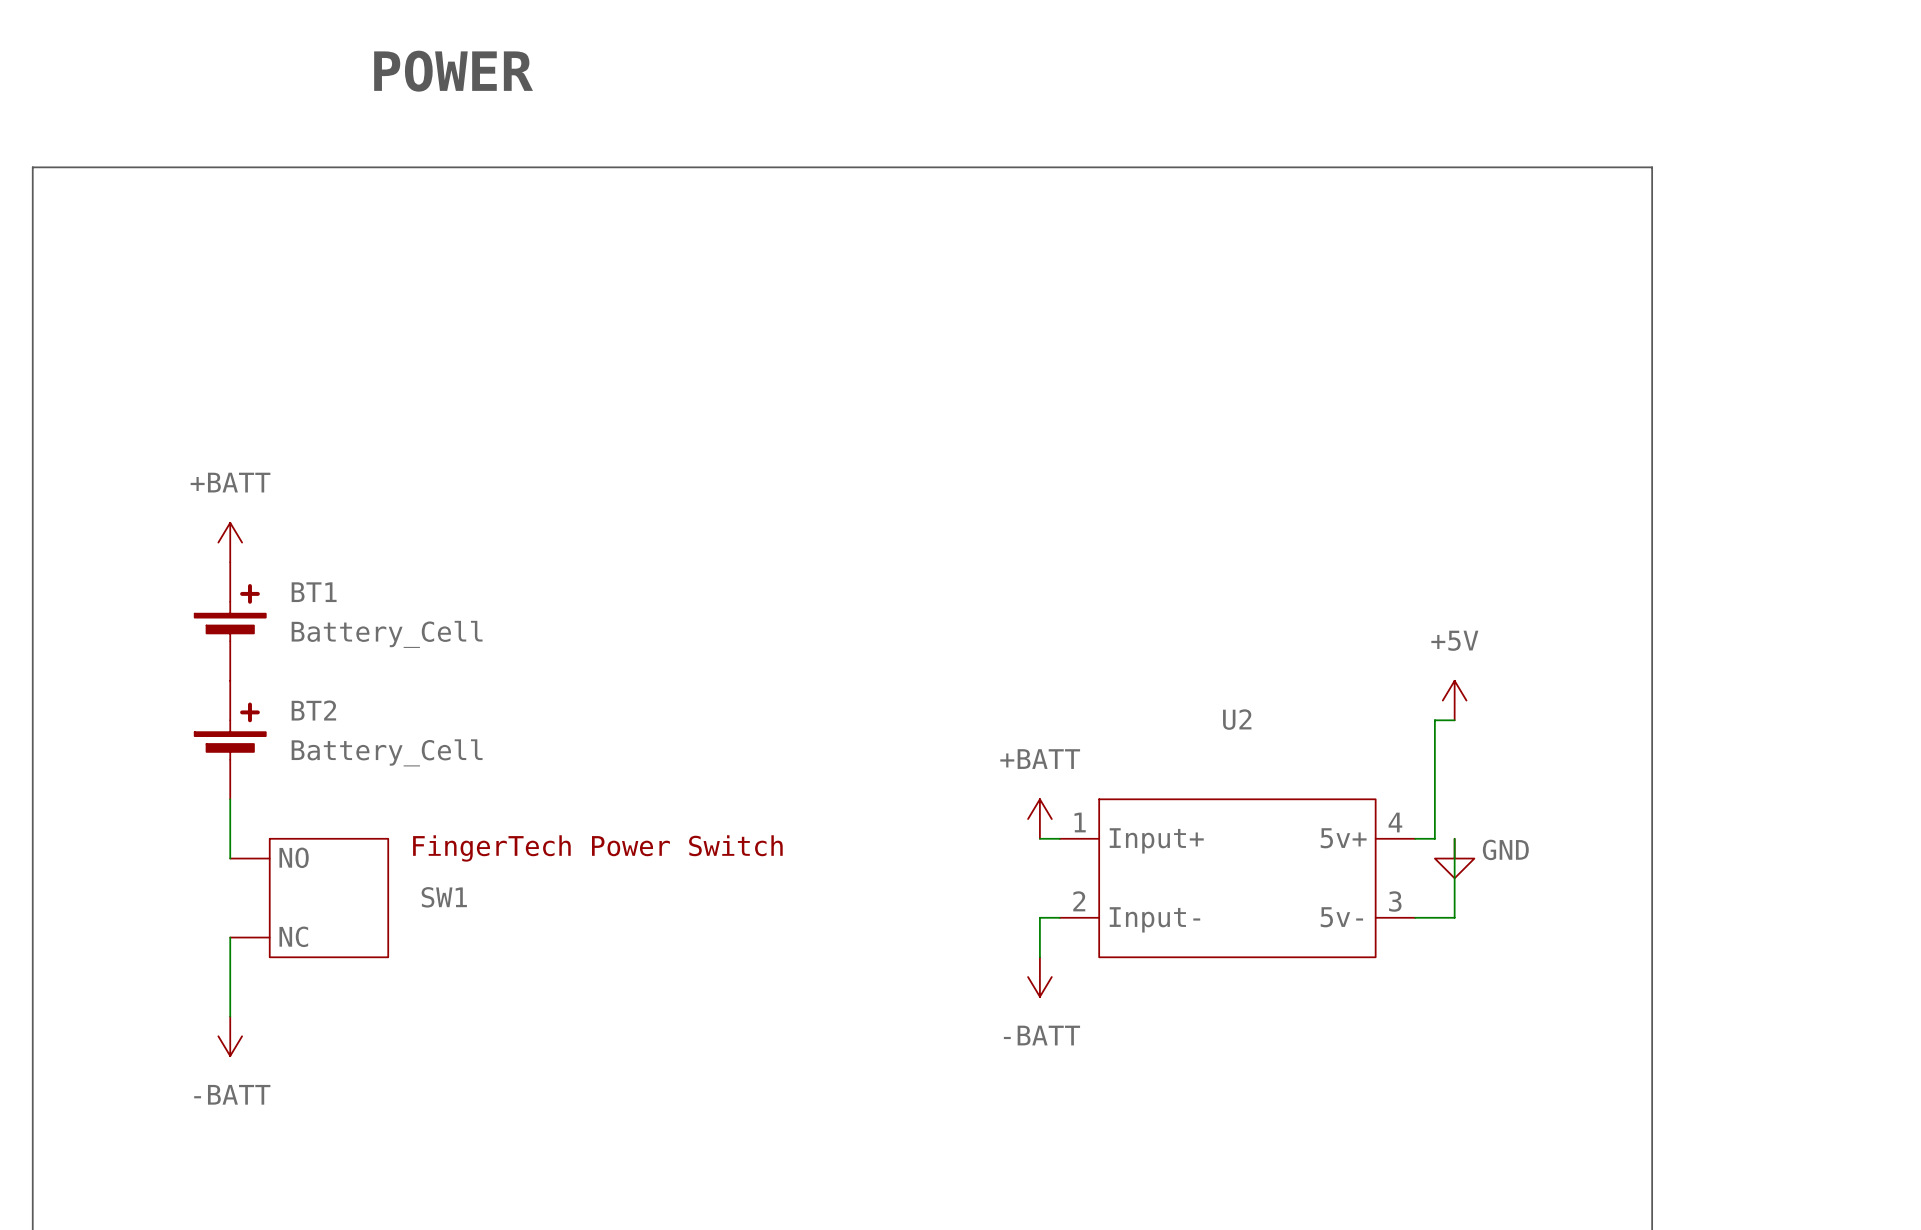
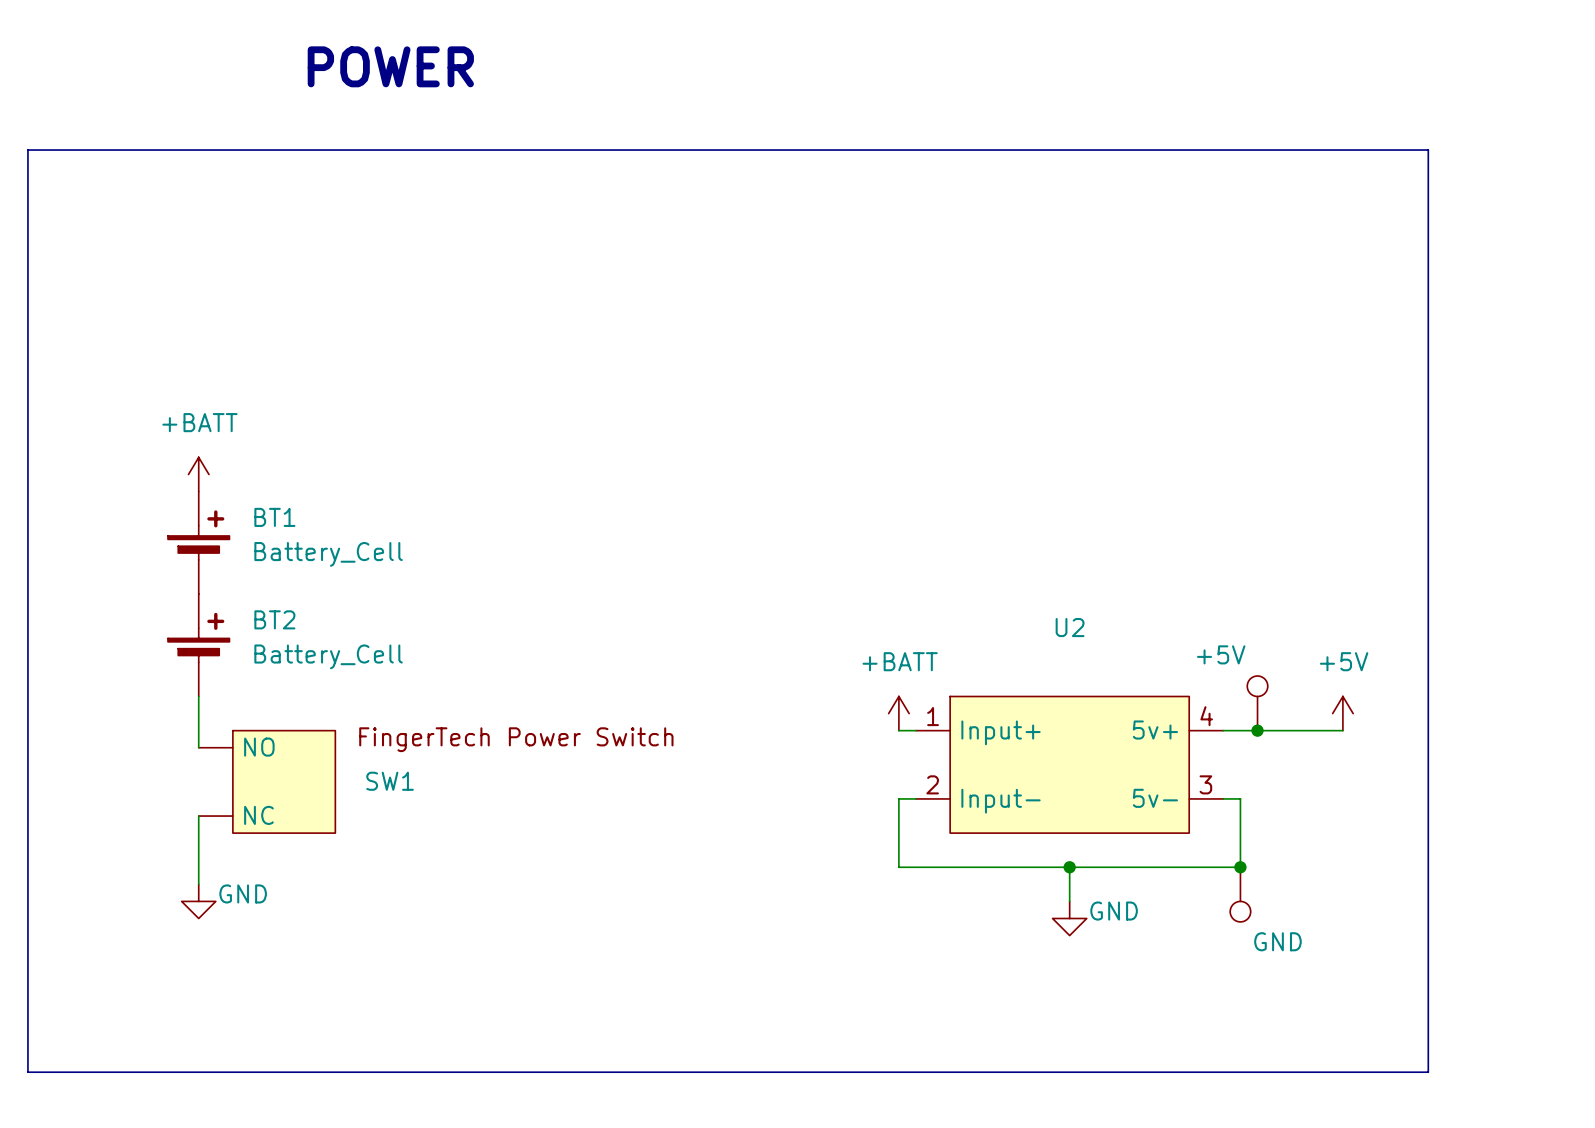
power symbol position: +5V (1454, 700) -> +5V (1342, 713)
wire: (1454, 720) (1434, 720) (1434, 838) -> (1342, 730) (1240, 730)
part: none -> +5V (1257, 703)
wire: (1454, 838) (1454, 917) (1434, 917) -> (898, 833) (898, 867) (1240, 867) (1240, 798)
junction: none -> (1257, 730)
power symbol position: GND (1454, 858) -> GND (1069, 918)
power symbol: -BATT (1039, 977) -> none
wire: none -> (1069, 867) (1069, 901)
junction: none -> (1069, 867)
junction: none -> (1240, 867)
part: none -> GND (1240, 894)
power symbol: -BATT (230, 1036) -> GND (198, 901)

